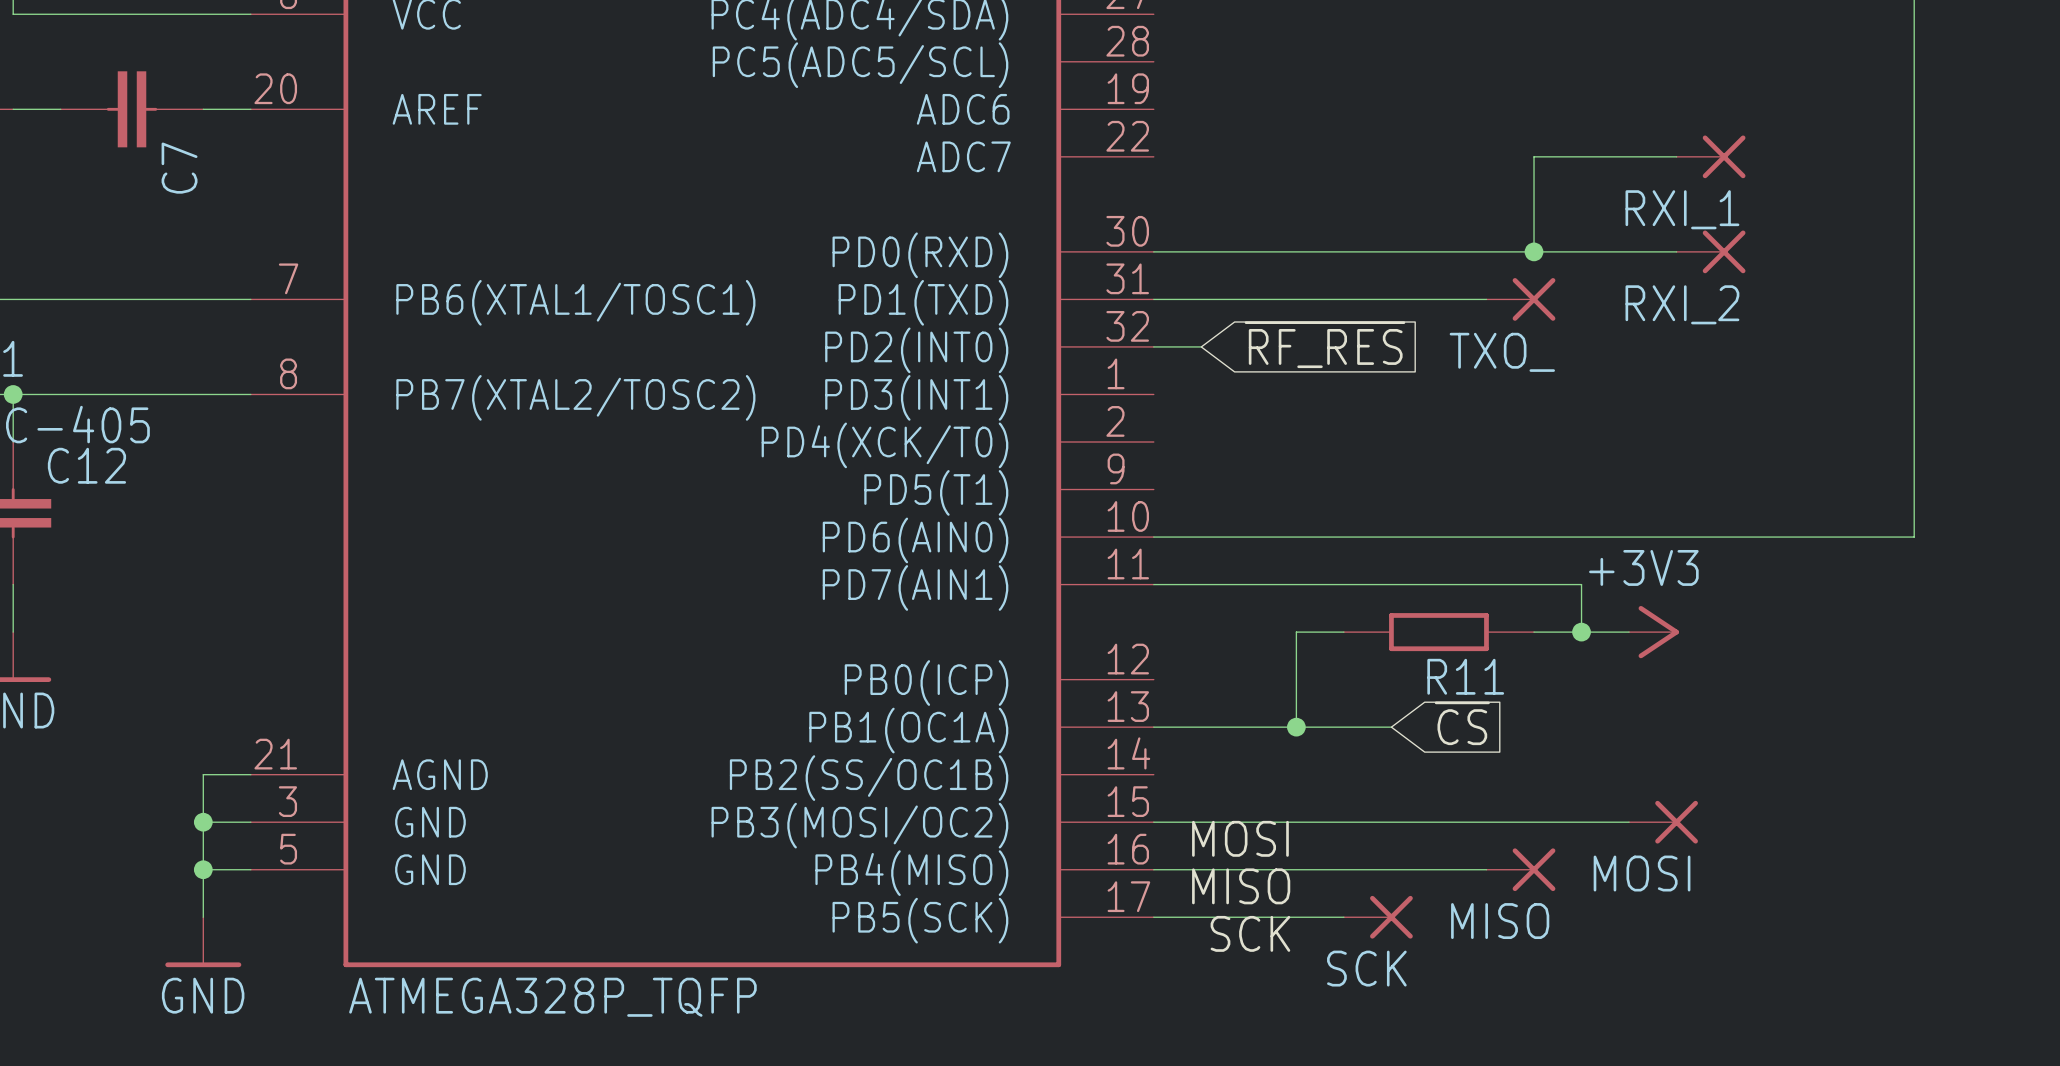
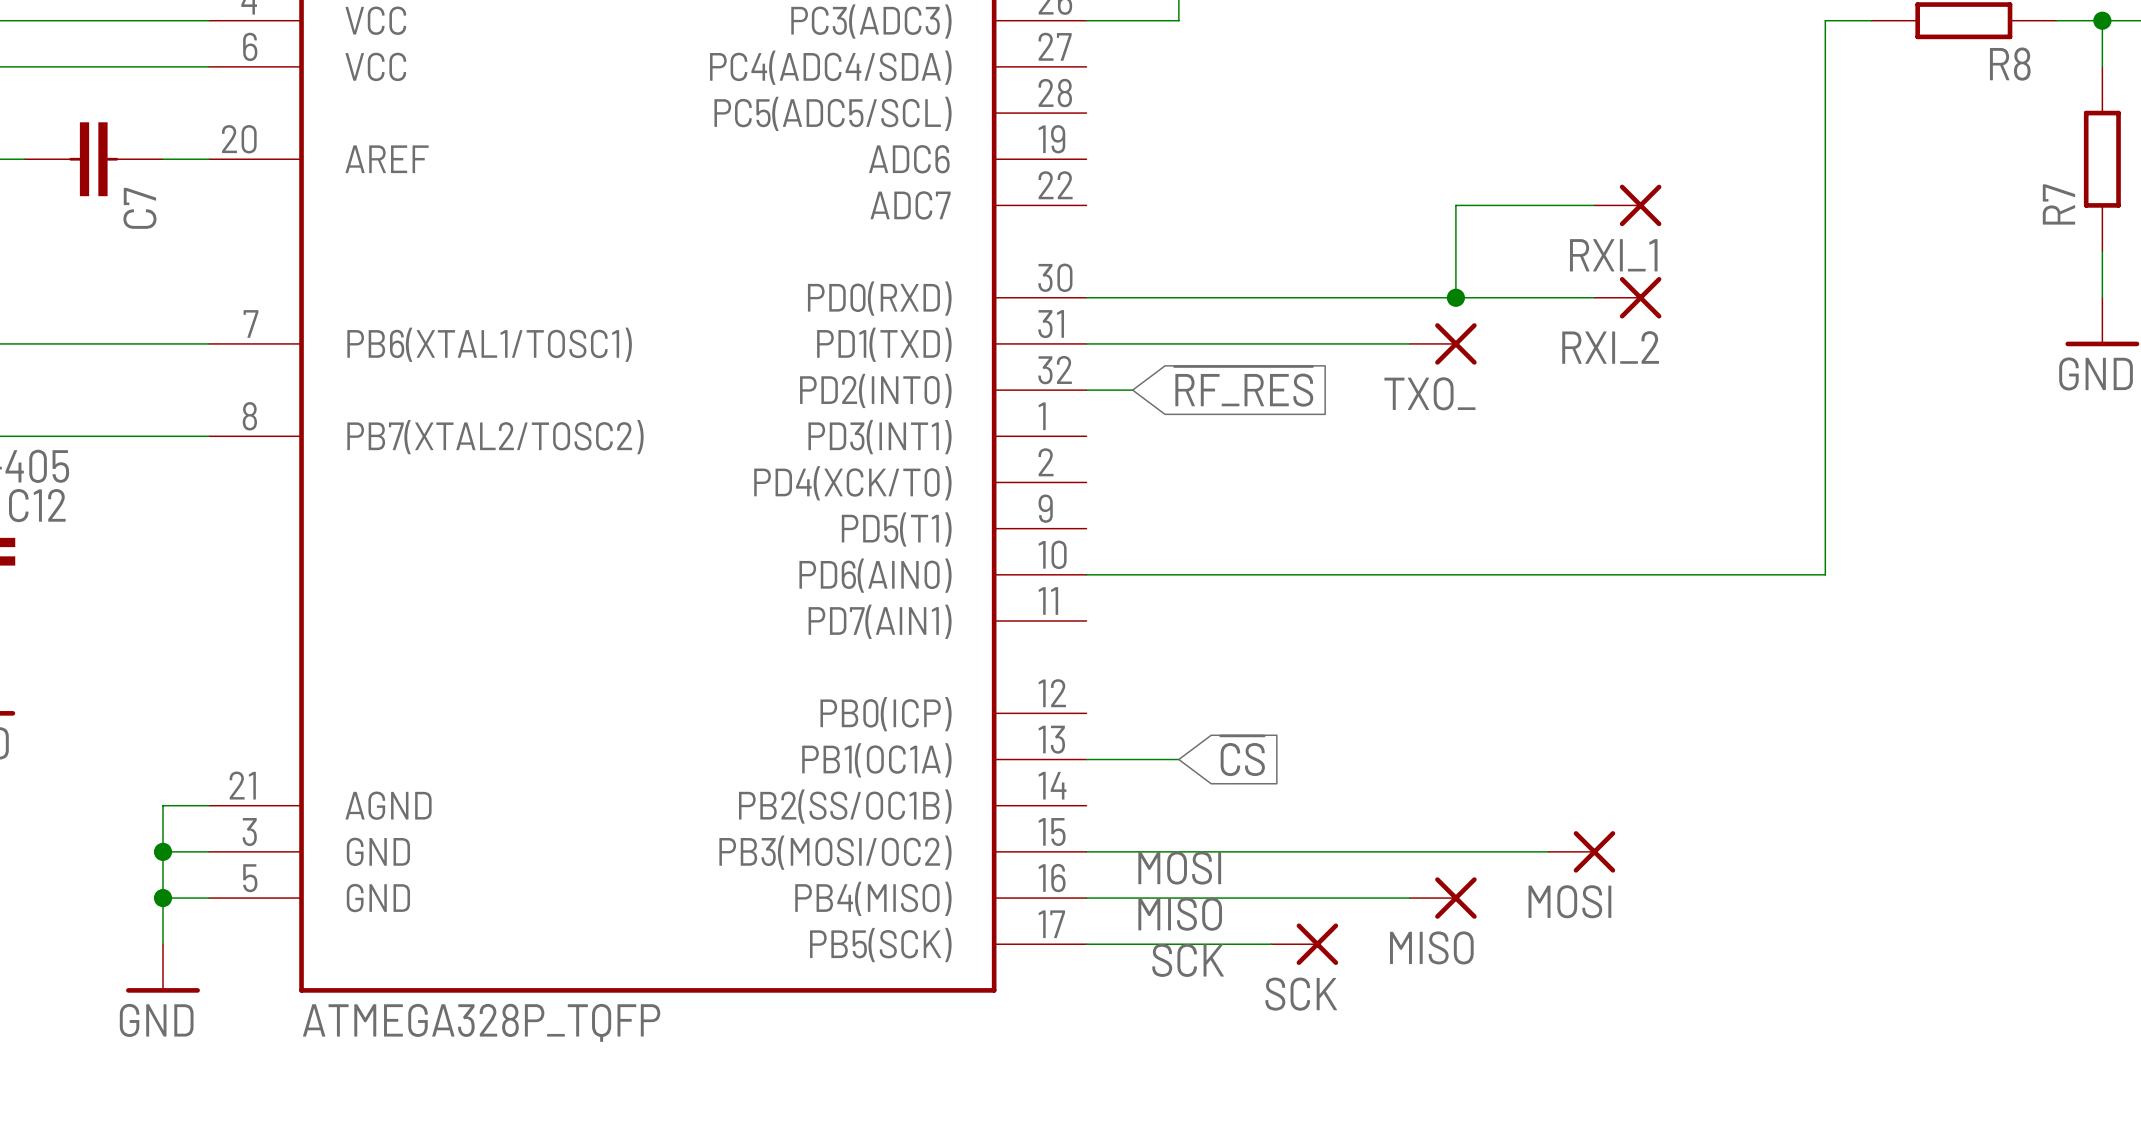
wire: (1153, 584) (1581, 584) (1581, 632) -> none
wire: (1343, 632) (1296, 632) (1296, 727) -> none
R11: (1438, 632) -> none
wire: (1534, 632) (1629, 632) -> none
junction: (1581, 632) -> none
power symbol: +3V3 (1654, 632) -> none
global label position: ~{CS} (1462, 723) -> ~{CS} (1242, 756)
wire: (1248, 727) (1391, 727) -> none
junction: (1296, 727) -> none

